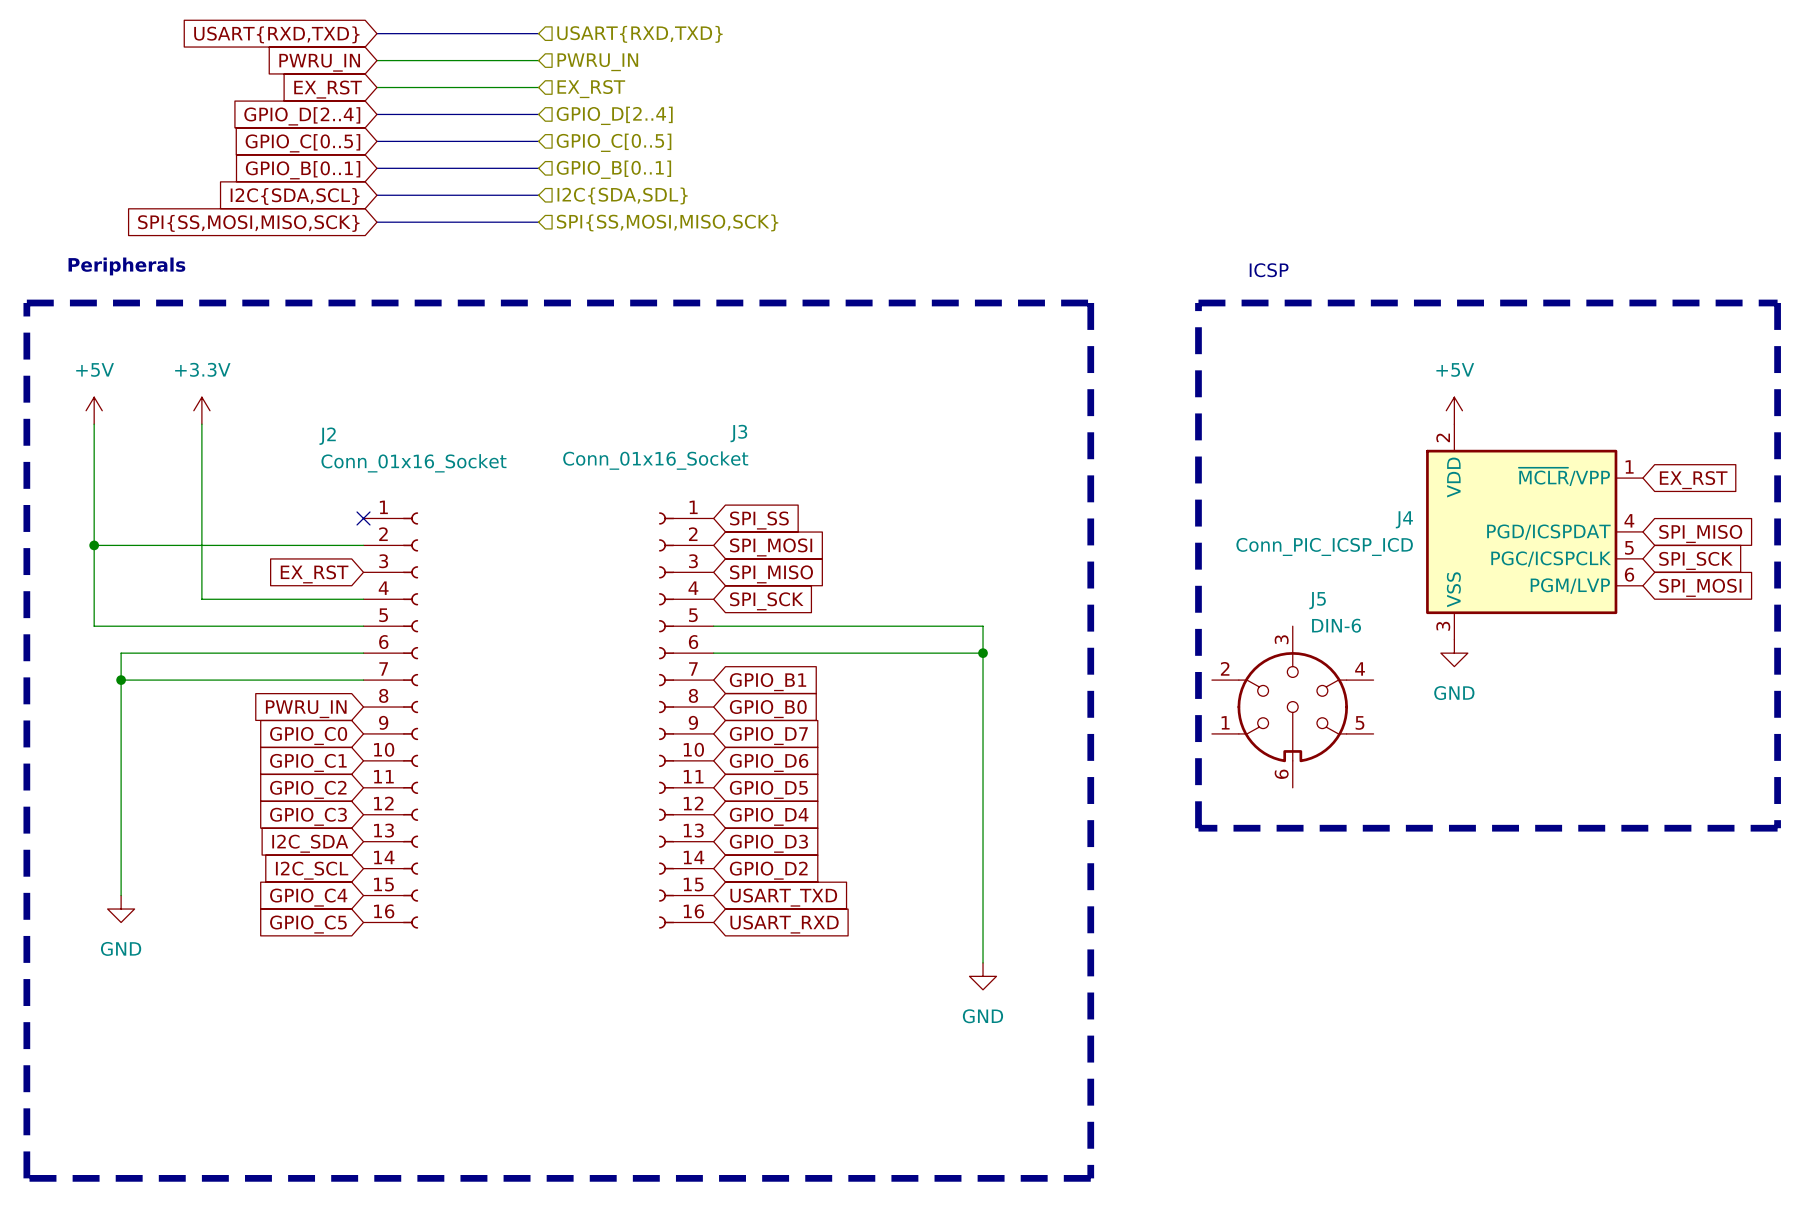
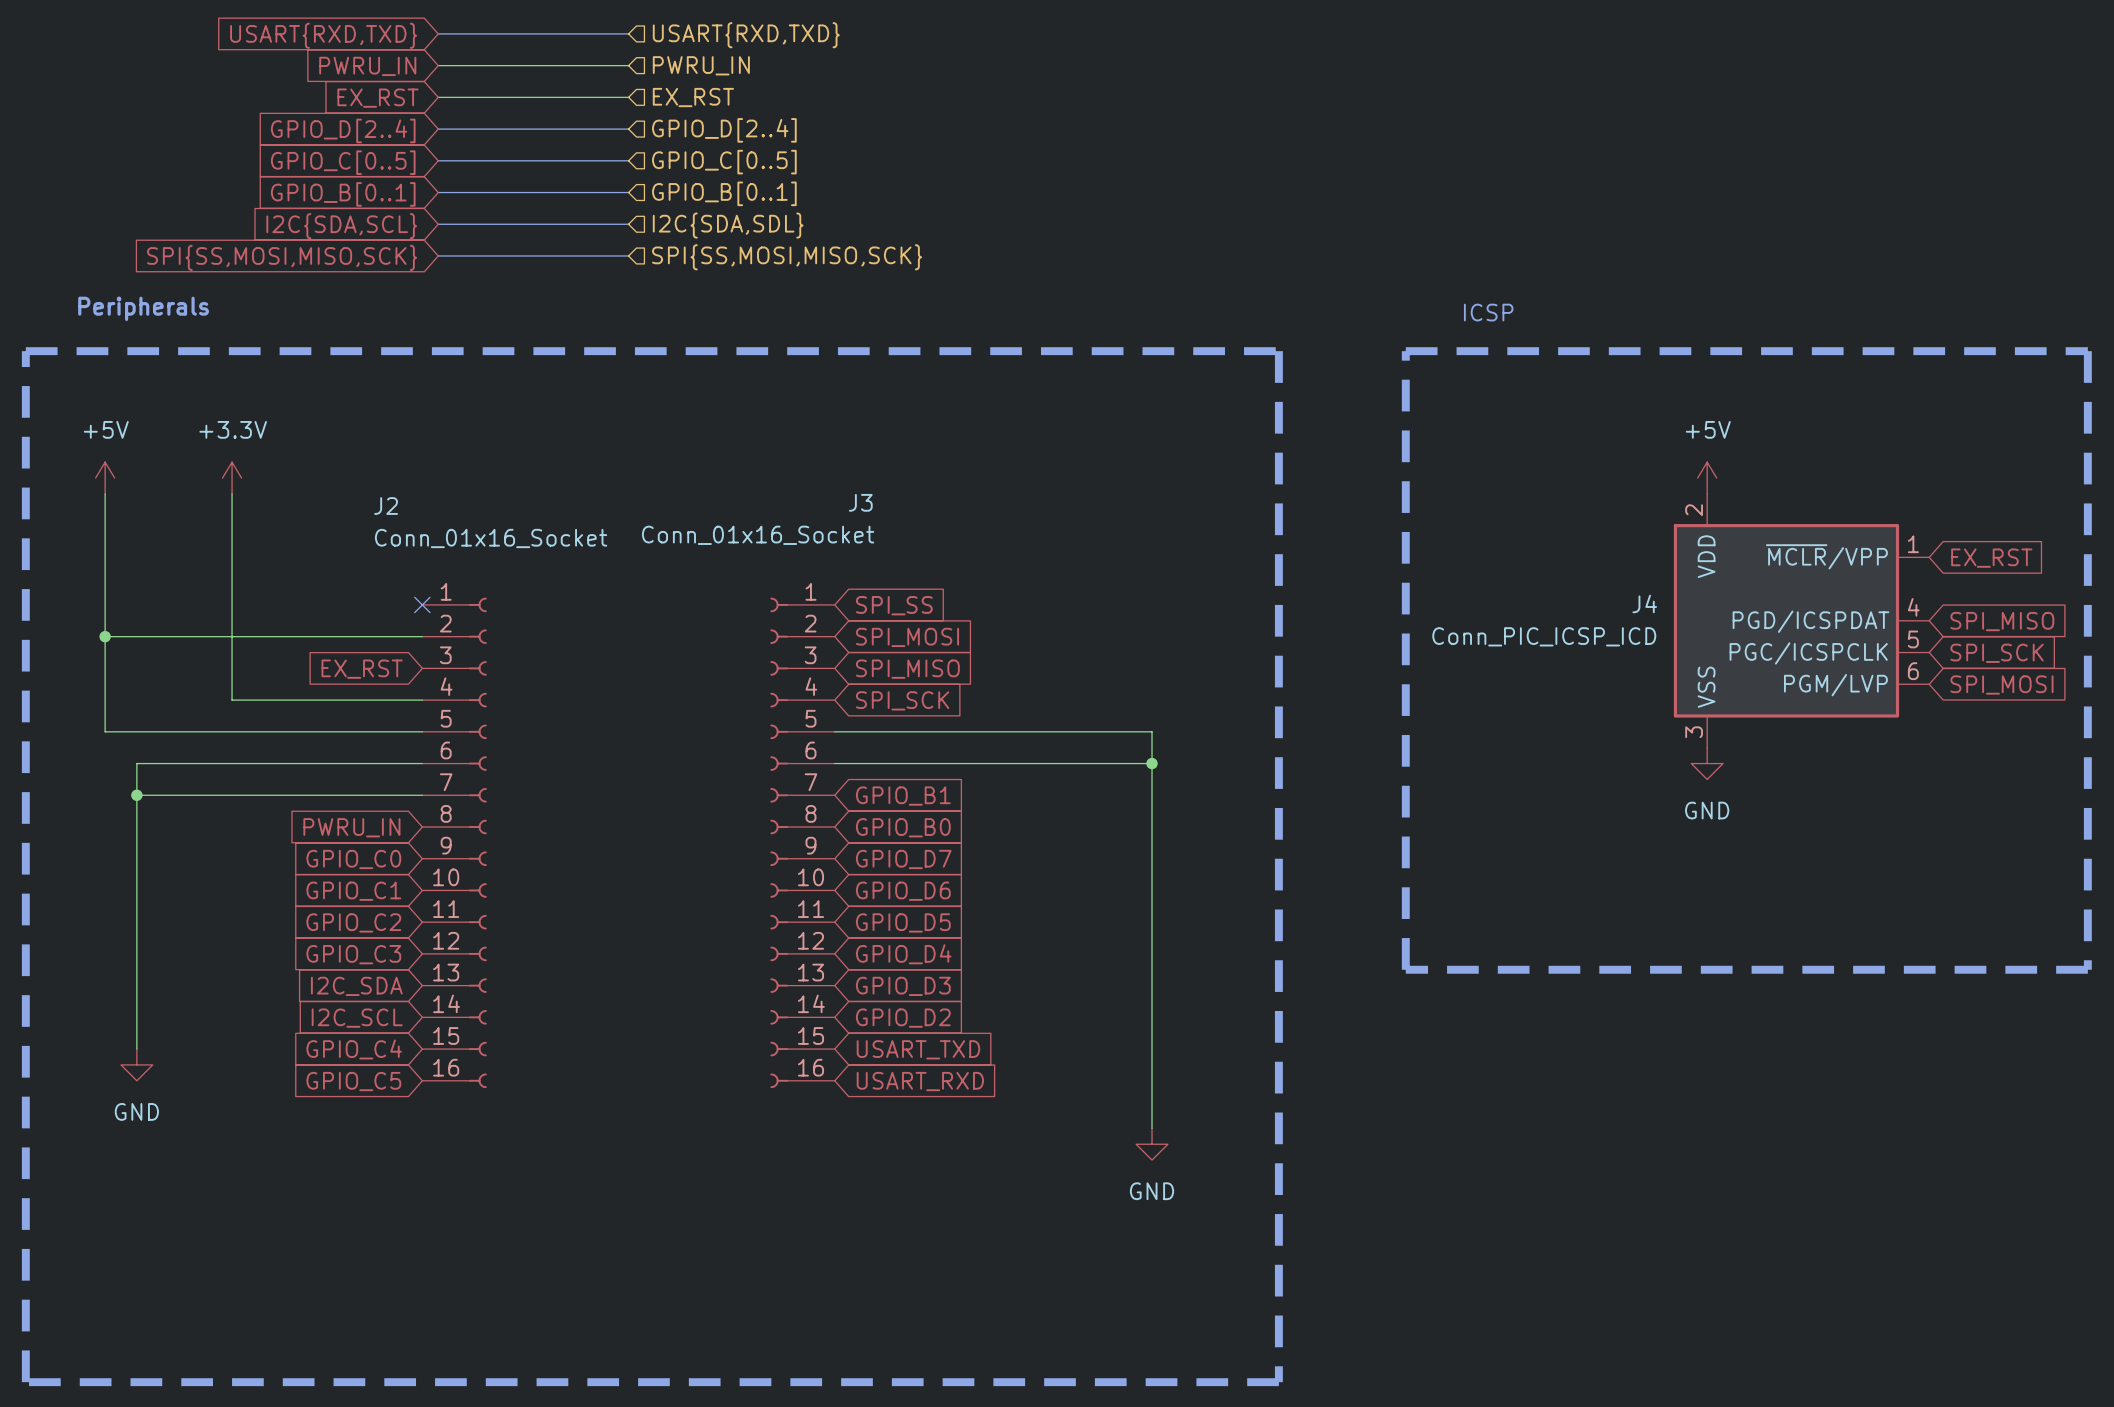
J5: DIN-6 (1292, 707) -> none

